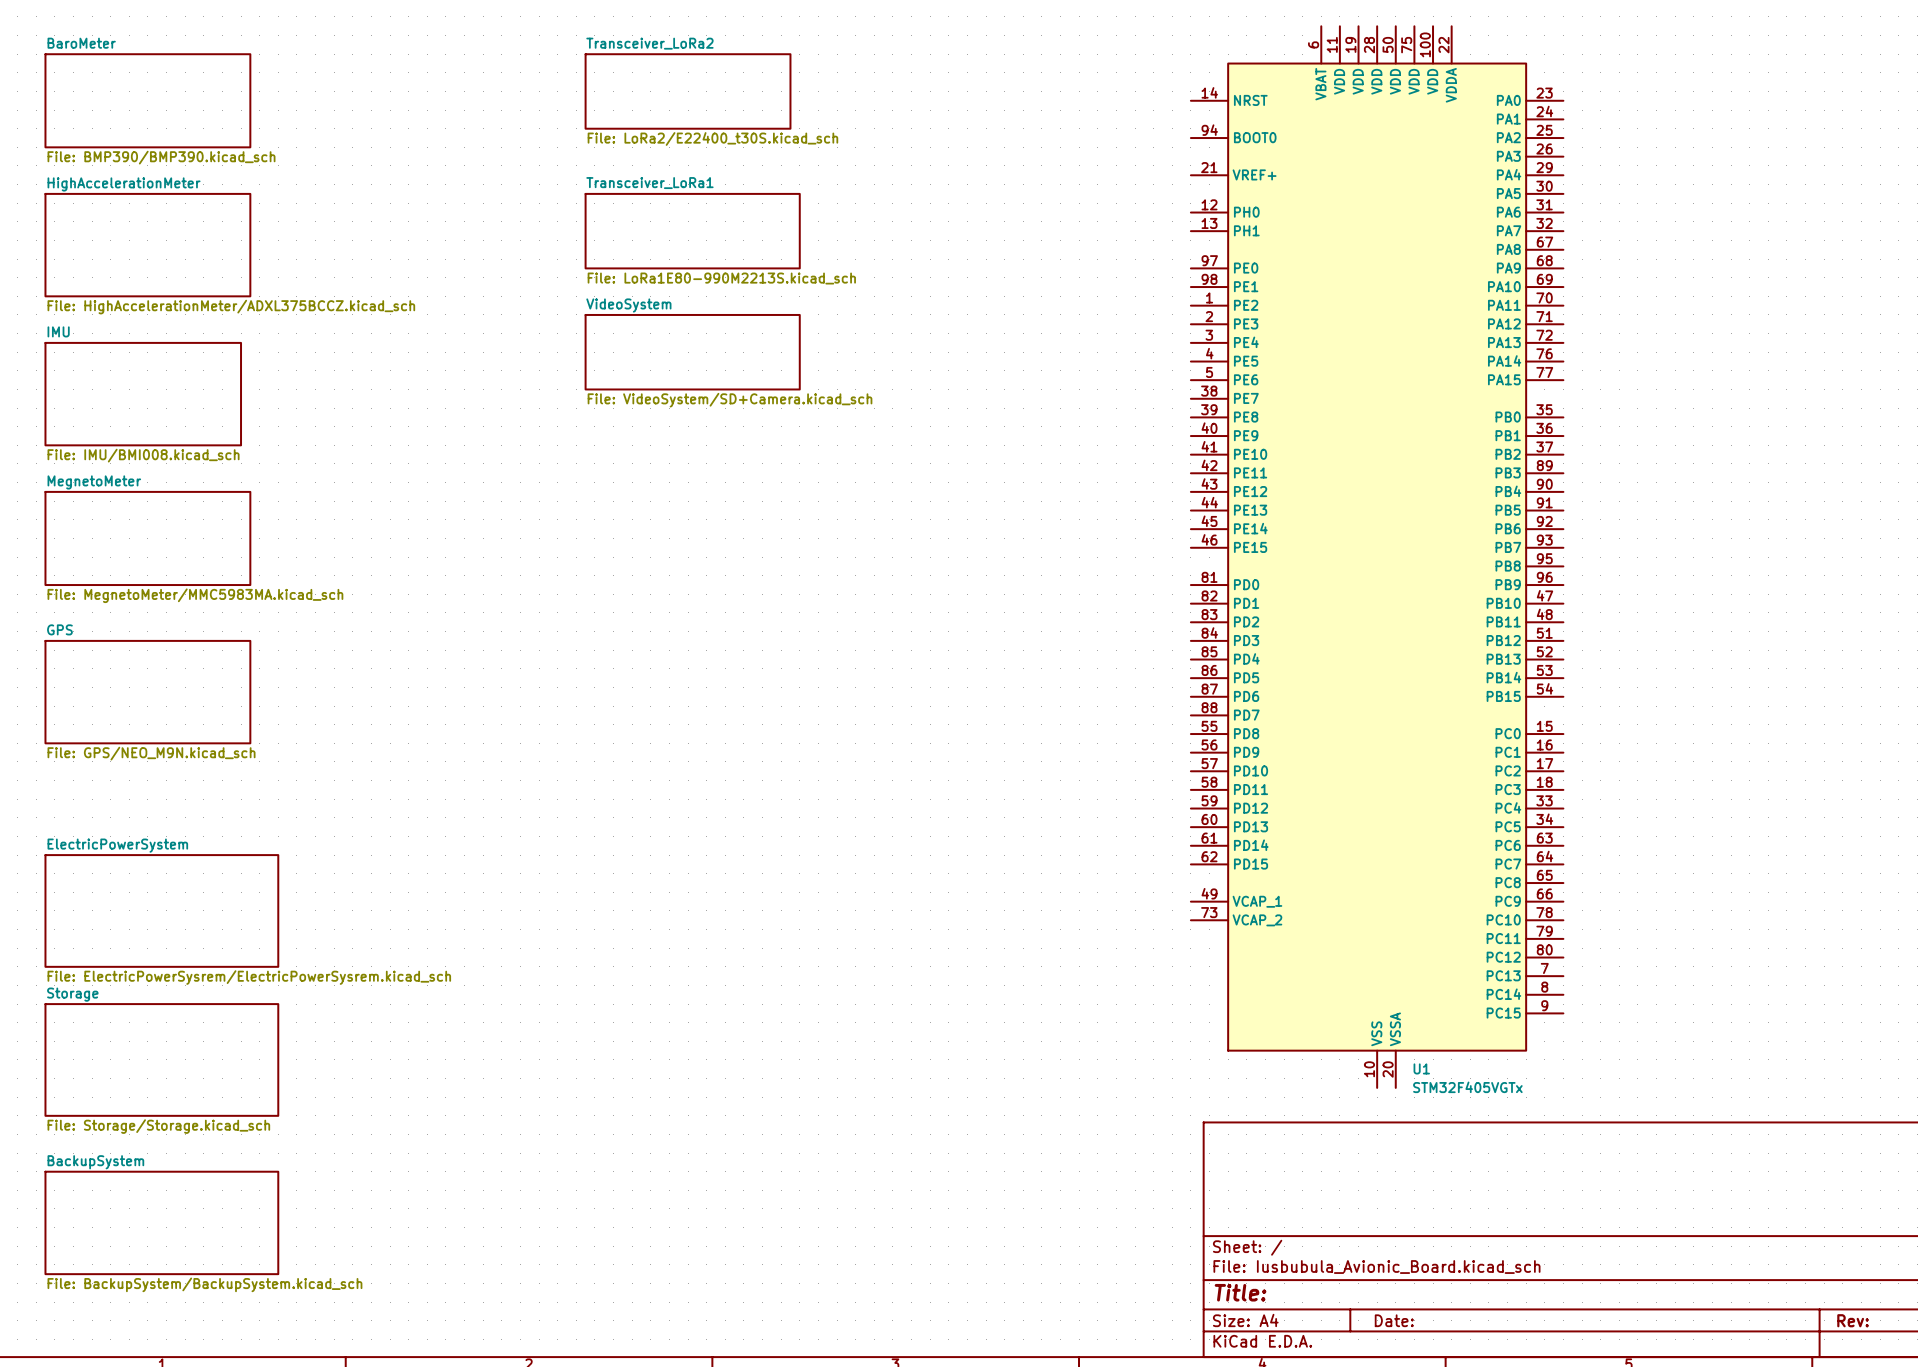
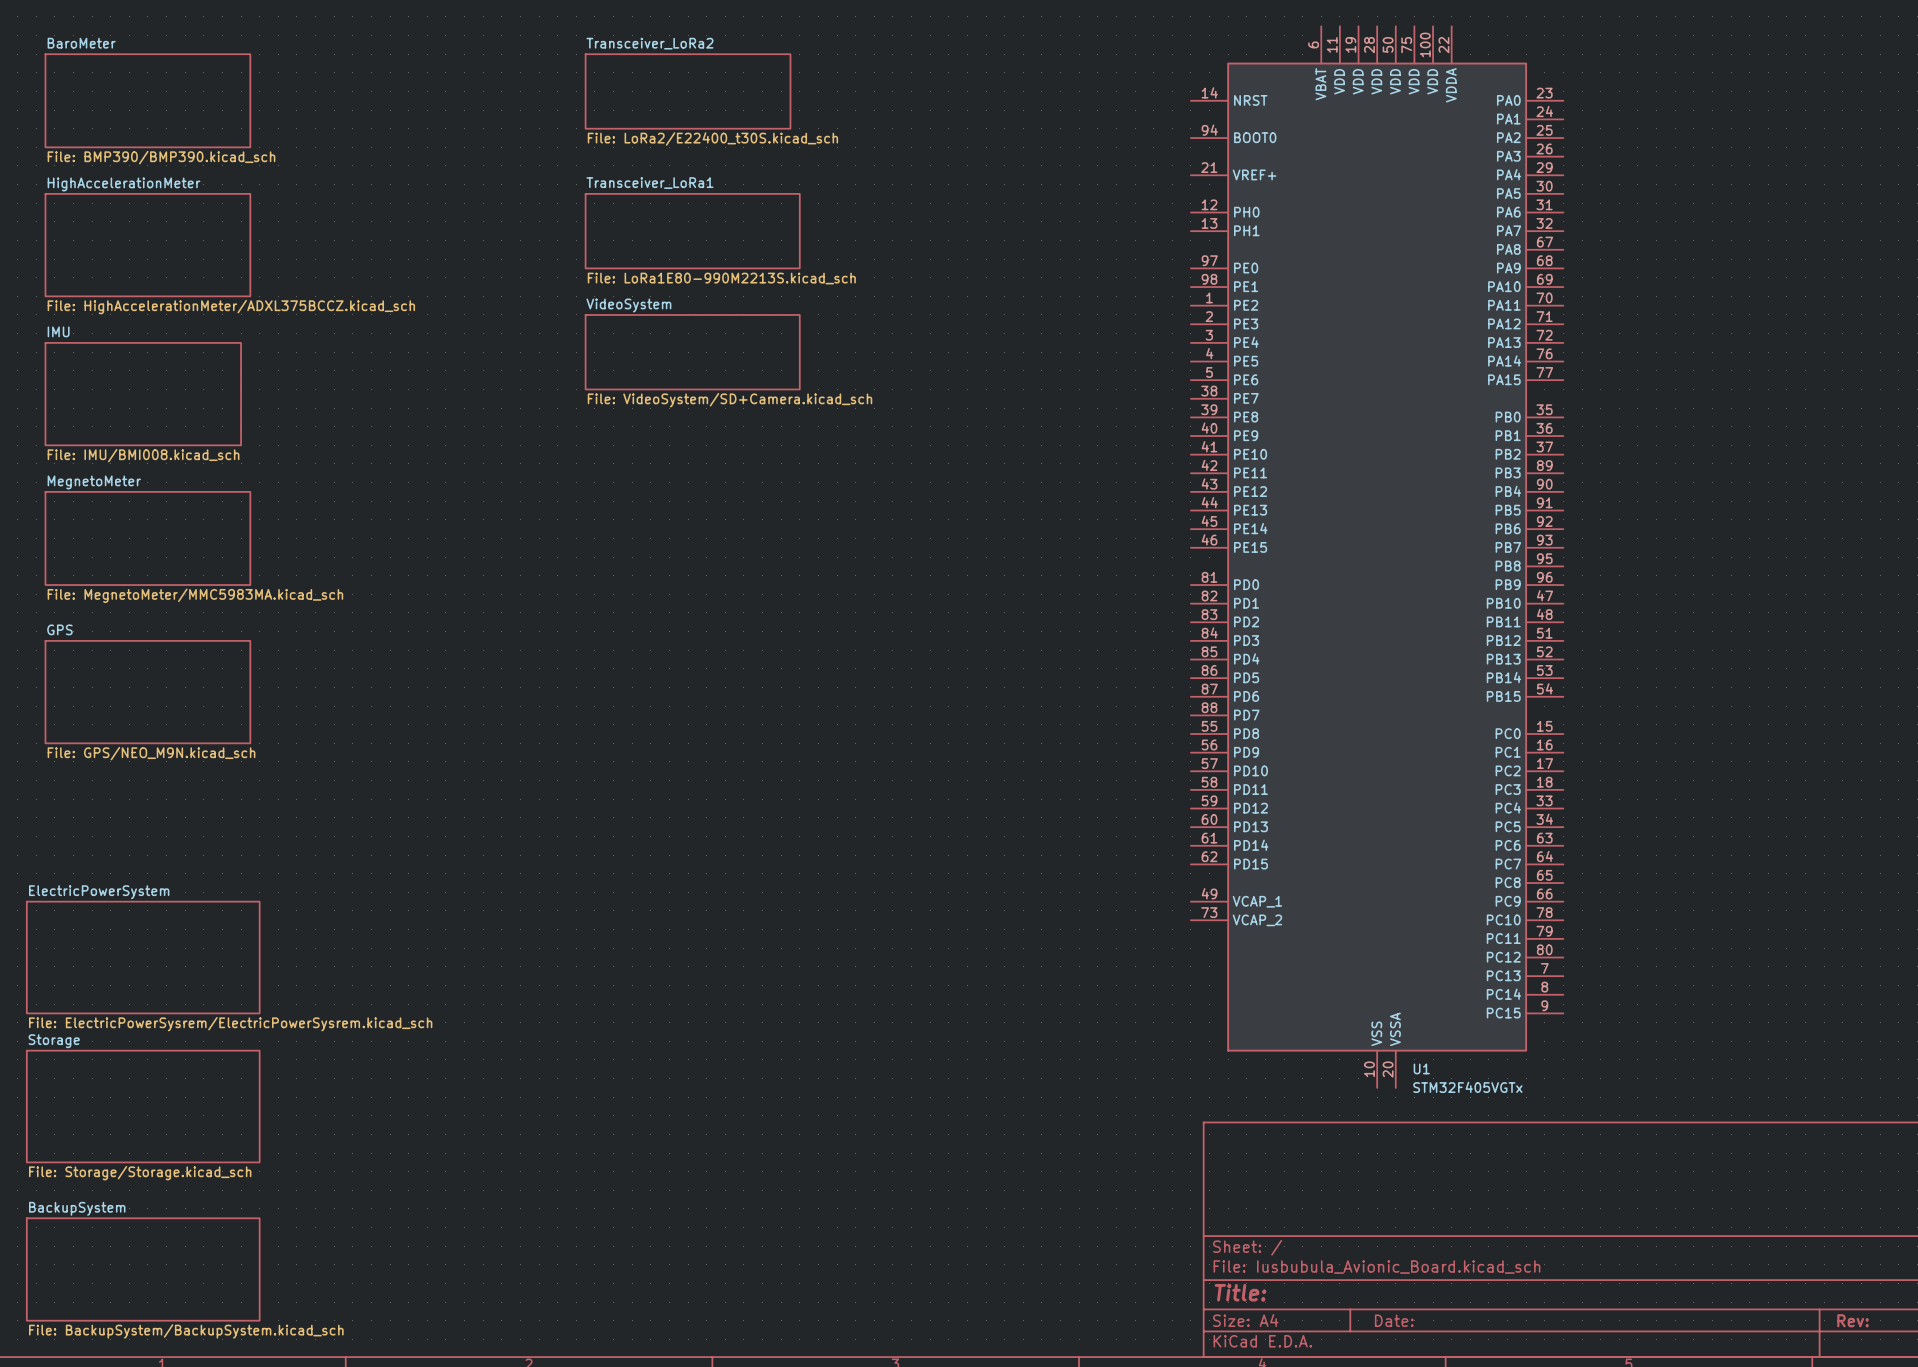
sheet ElectricPowerSystem position: (161, 910) -> (143, 957)
sheet Storage position: (161, 1059) -> (143, 1106)
sheet BackupSystem position: (161, 1222) -> (143, 1269)

